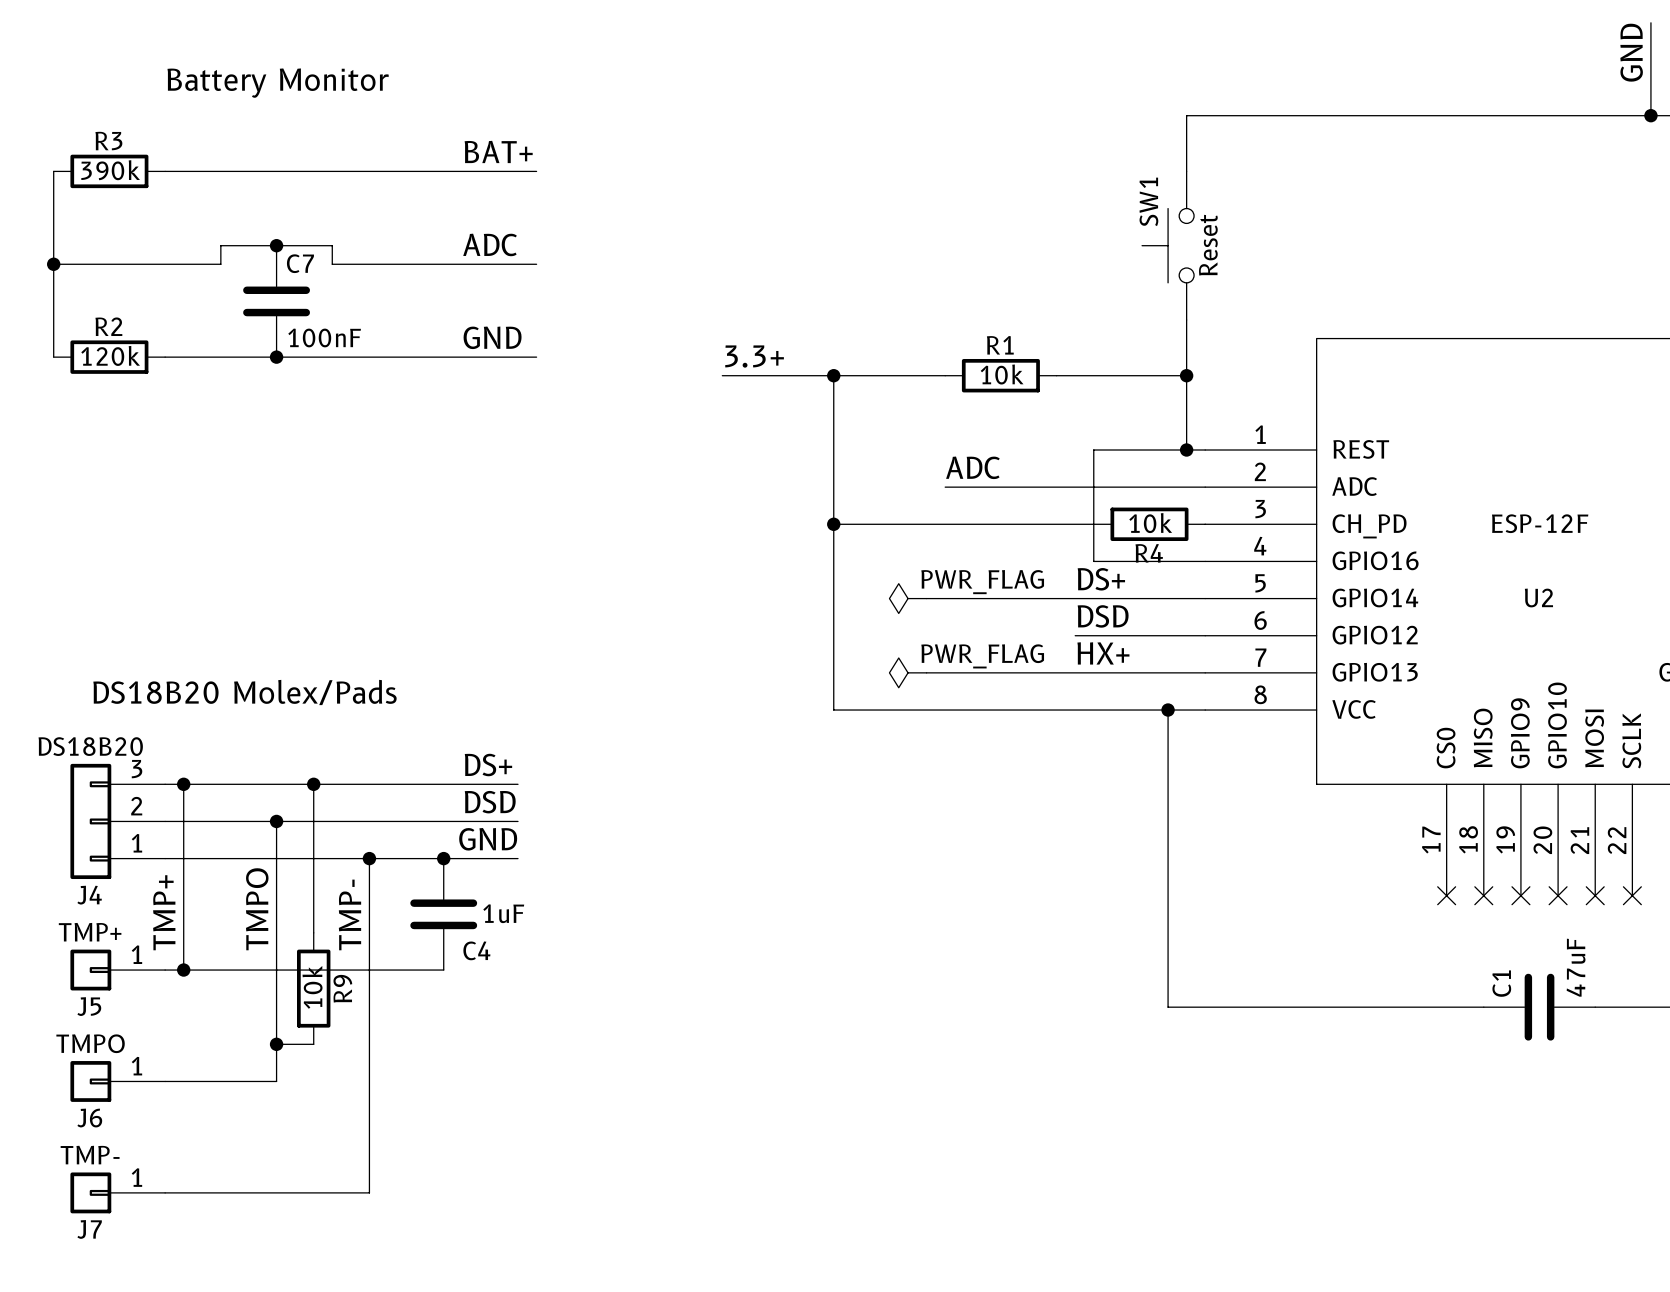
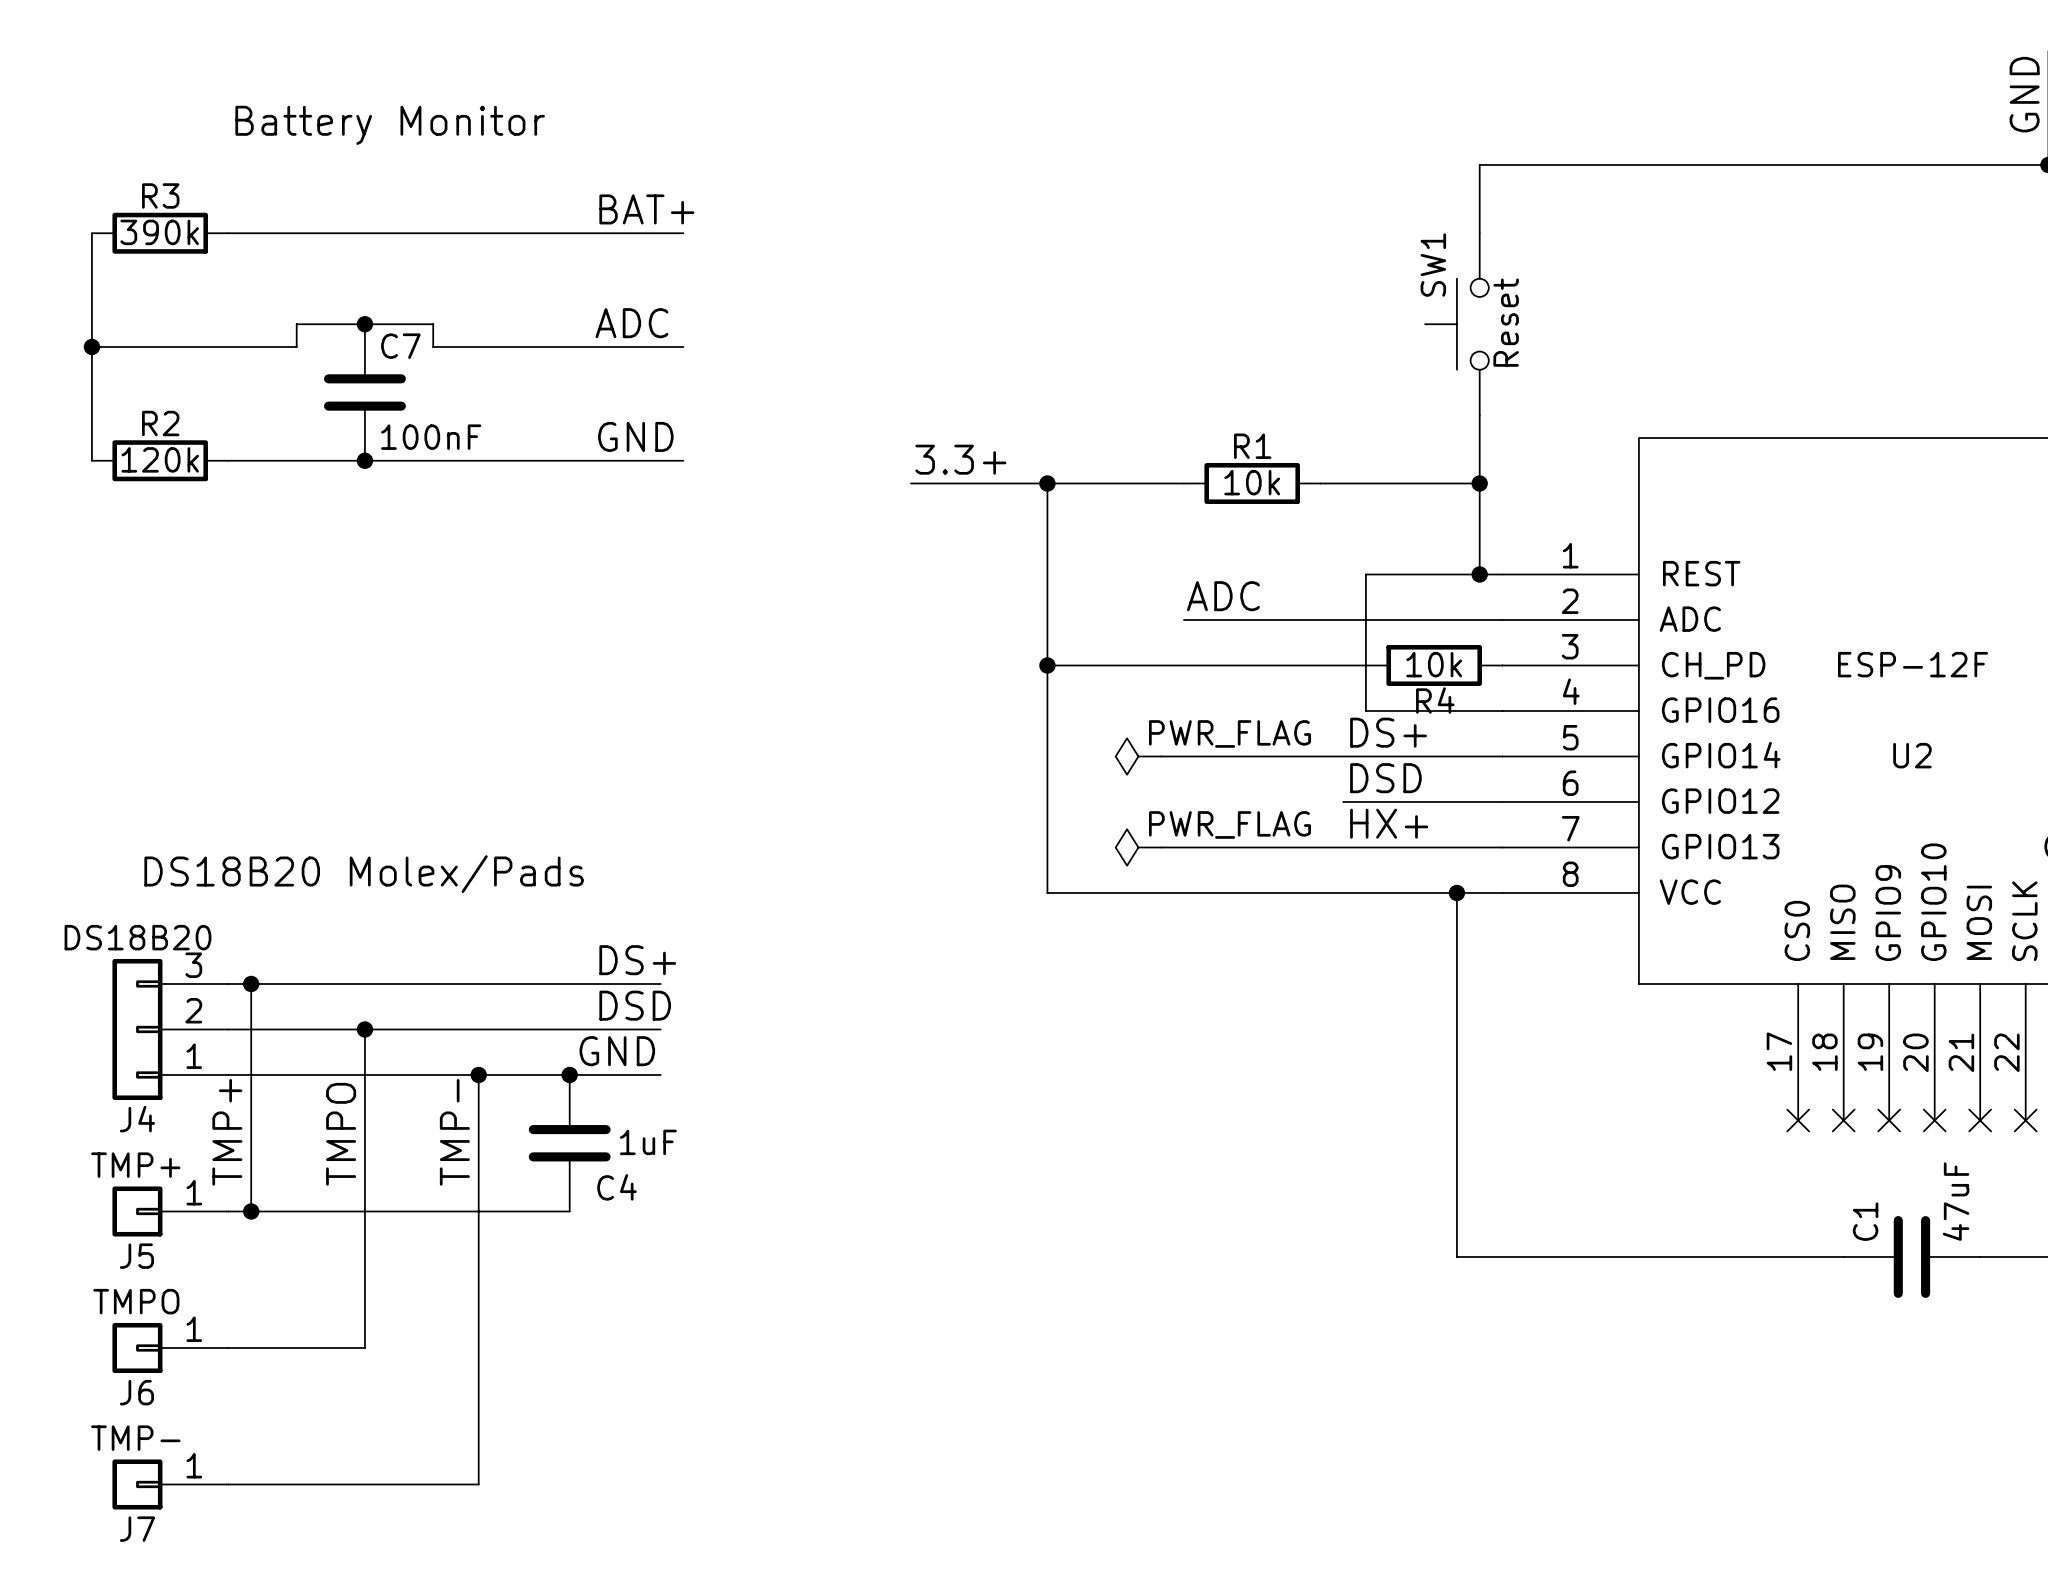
wire: (313, 784) (313, 932) -> none
junction: (313, 784) -> none
R9: 10k (313, 988) -> none
wire: (276, 1044) (313, 1044) -> none
junction: (276, 1044) -> none

